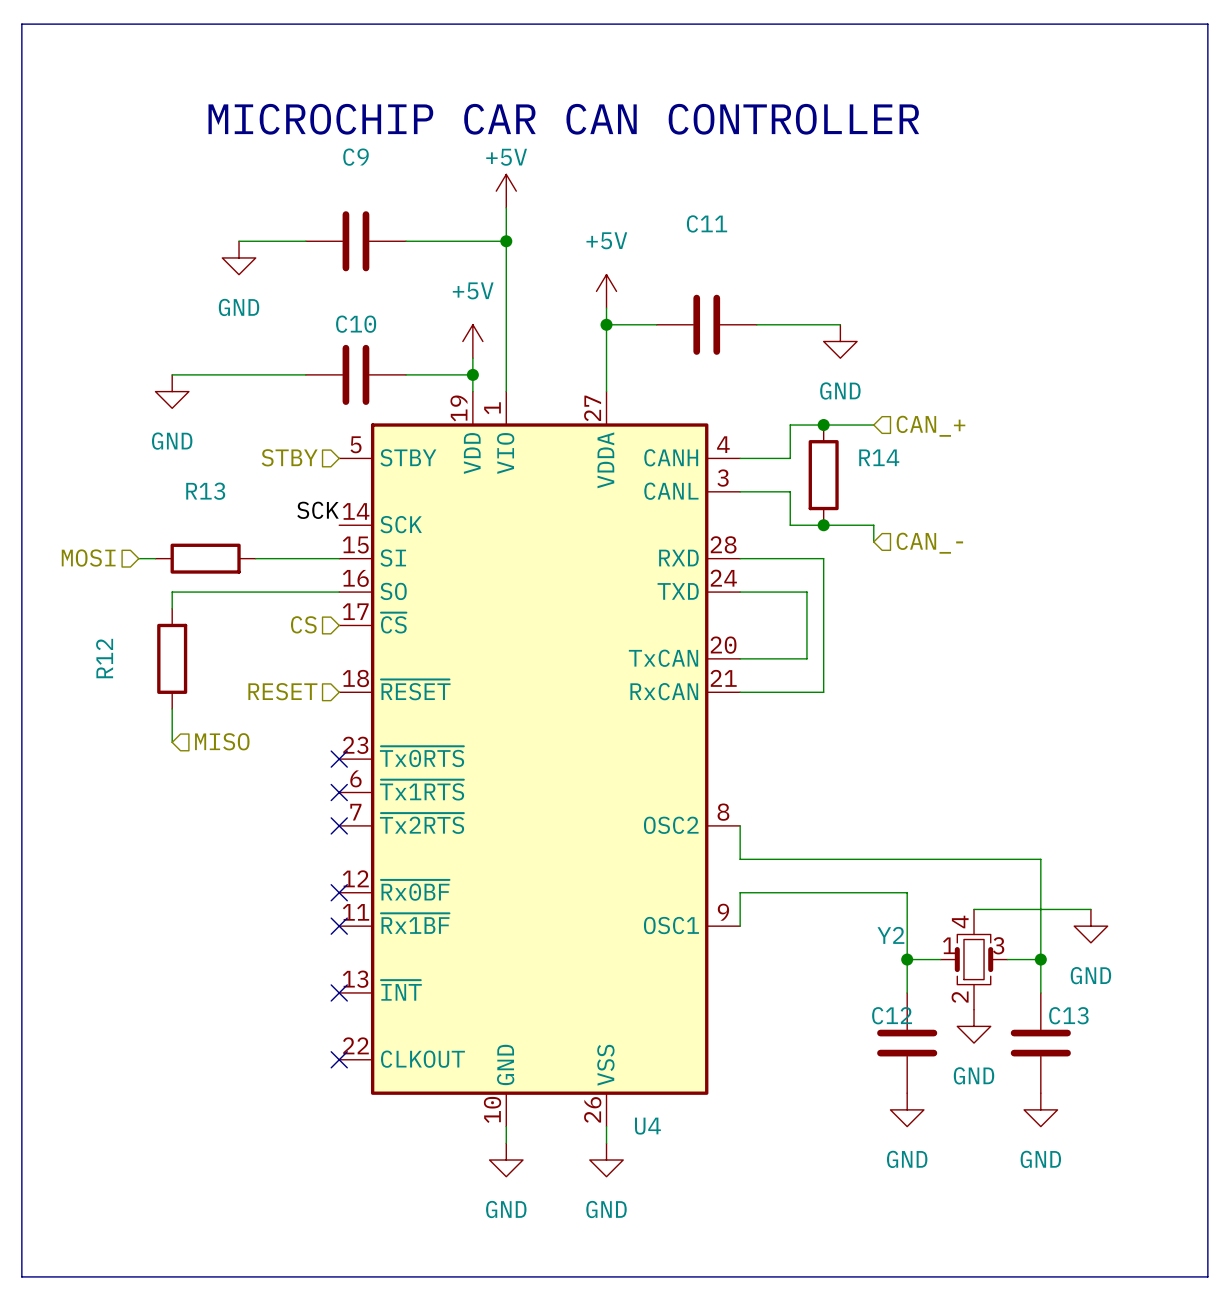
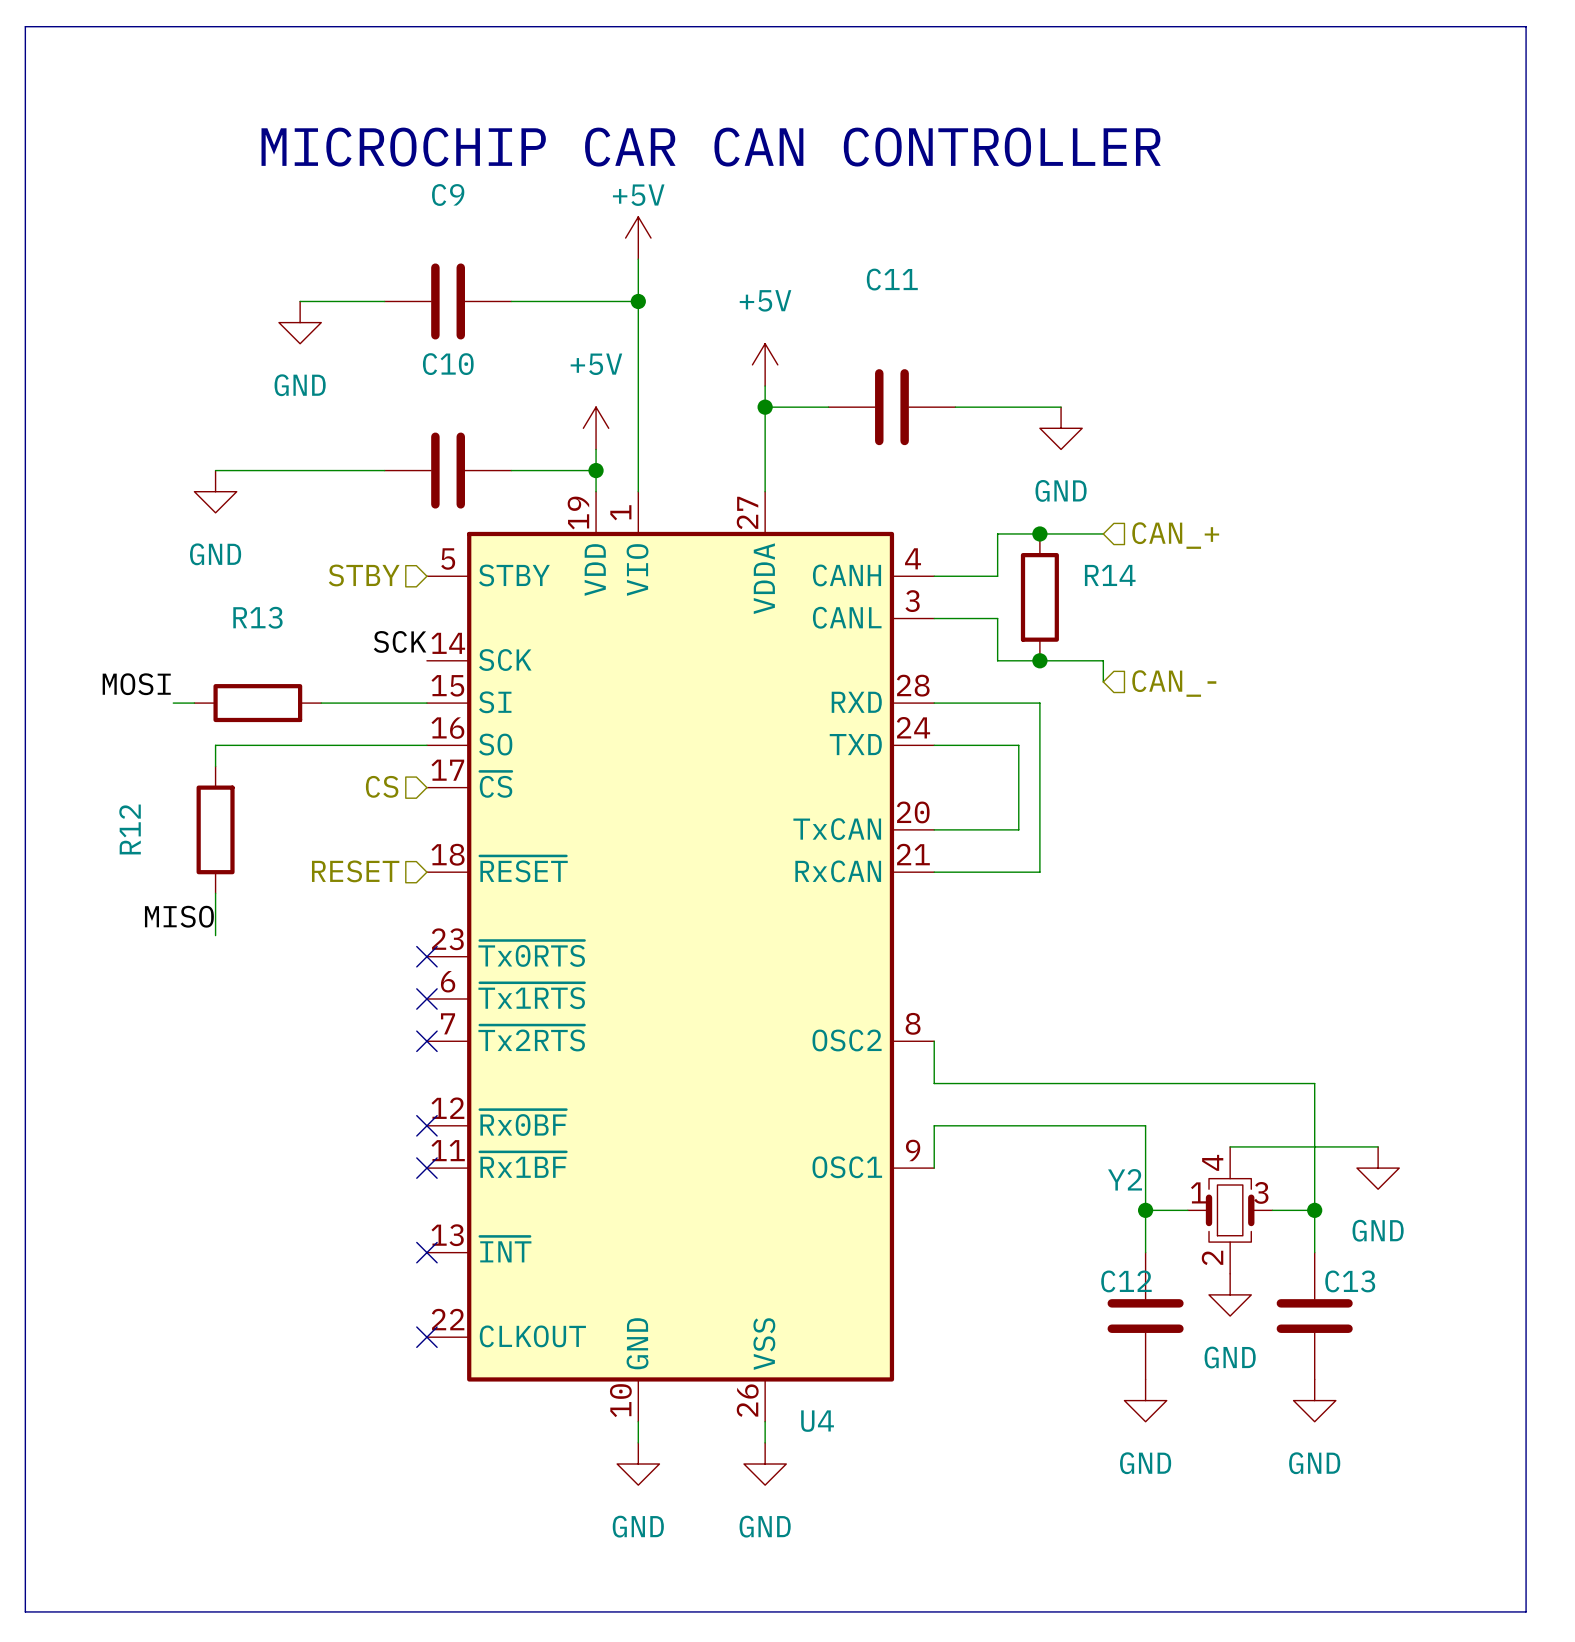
C10 name position: C10 (356, 324) -> C10 (448, 364)
label: none -> MOSI (136, 684)
hierarchical label: MOSI (88, 558) -> none
label: none -> MISO (179, 916)
hierarchical label: MISO (222, 741) -> none

